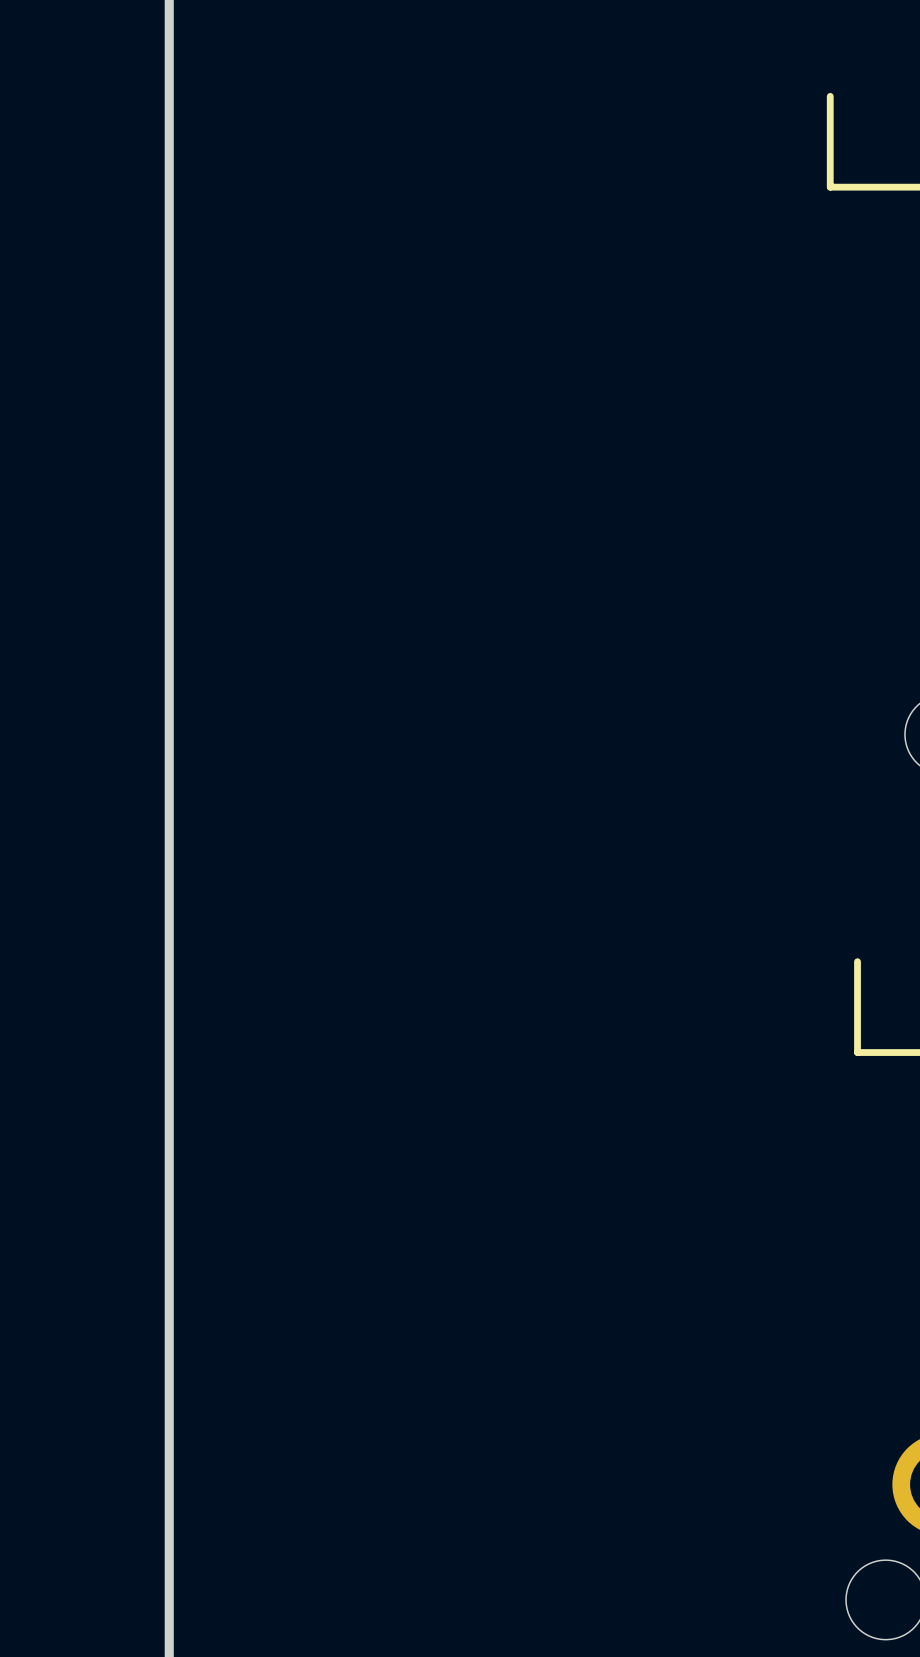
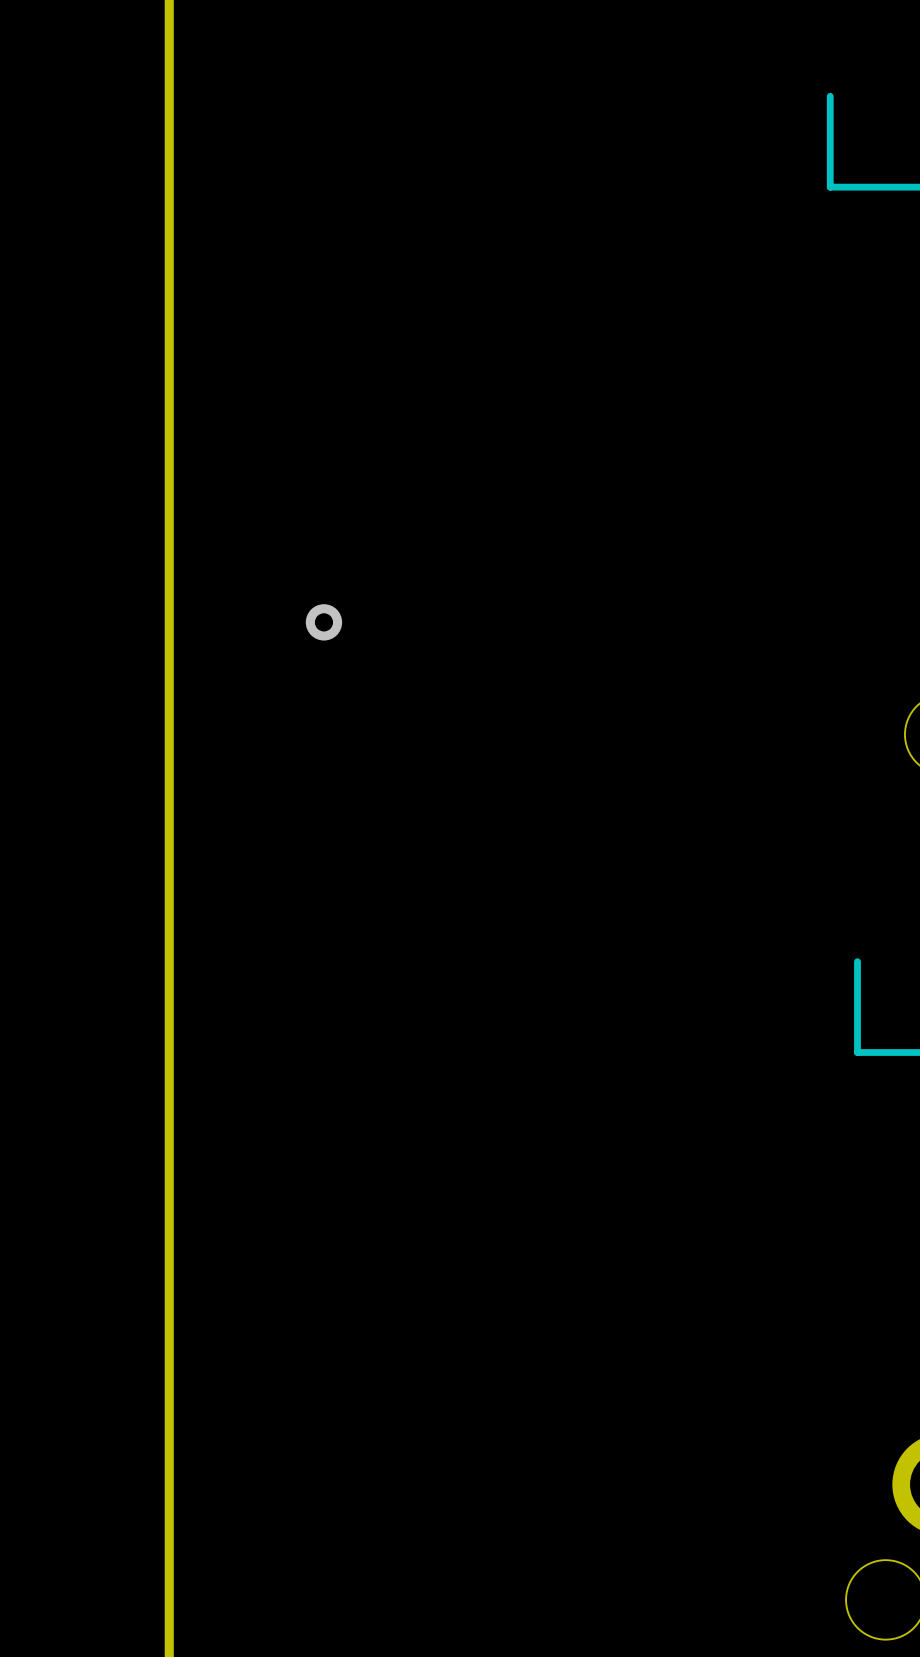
via: none -> (323, 622)

